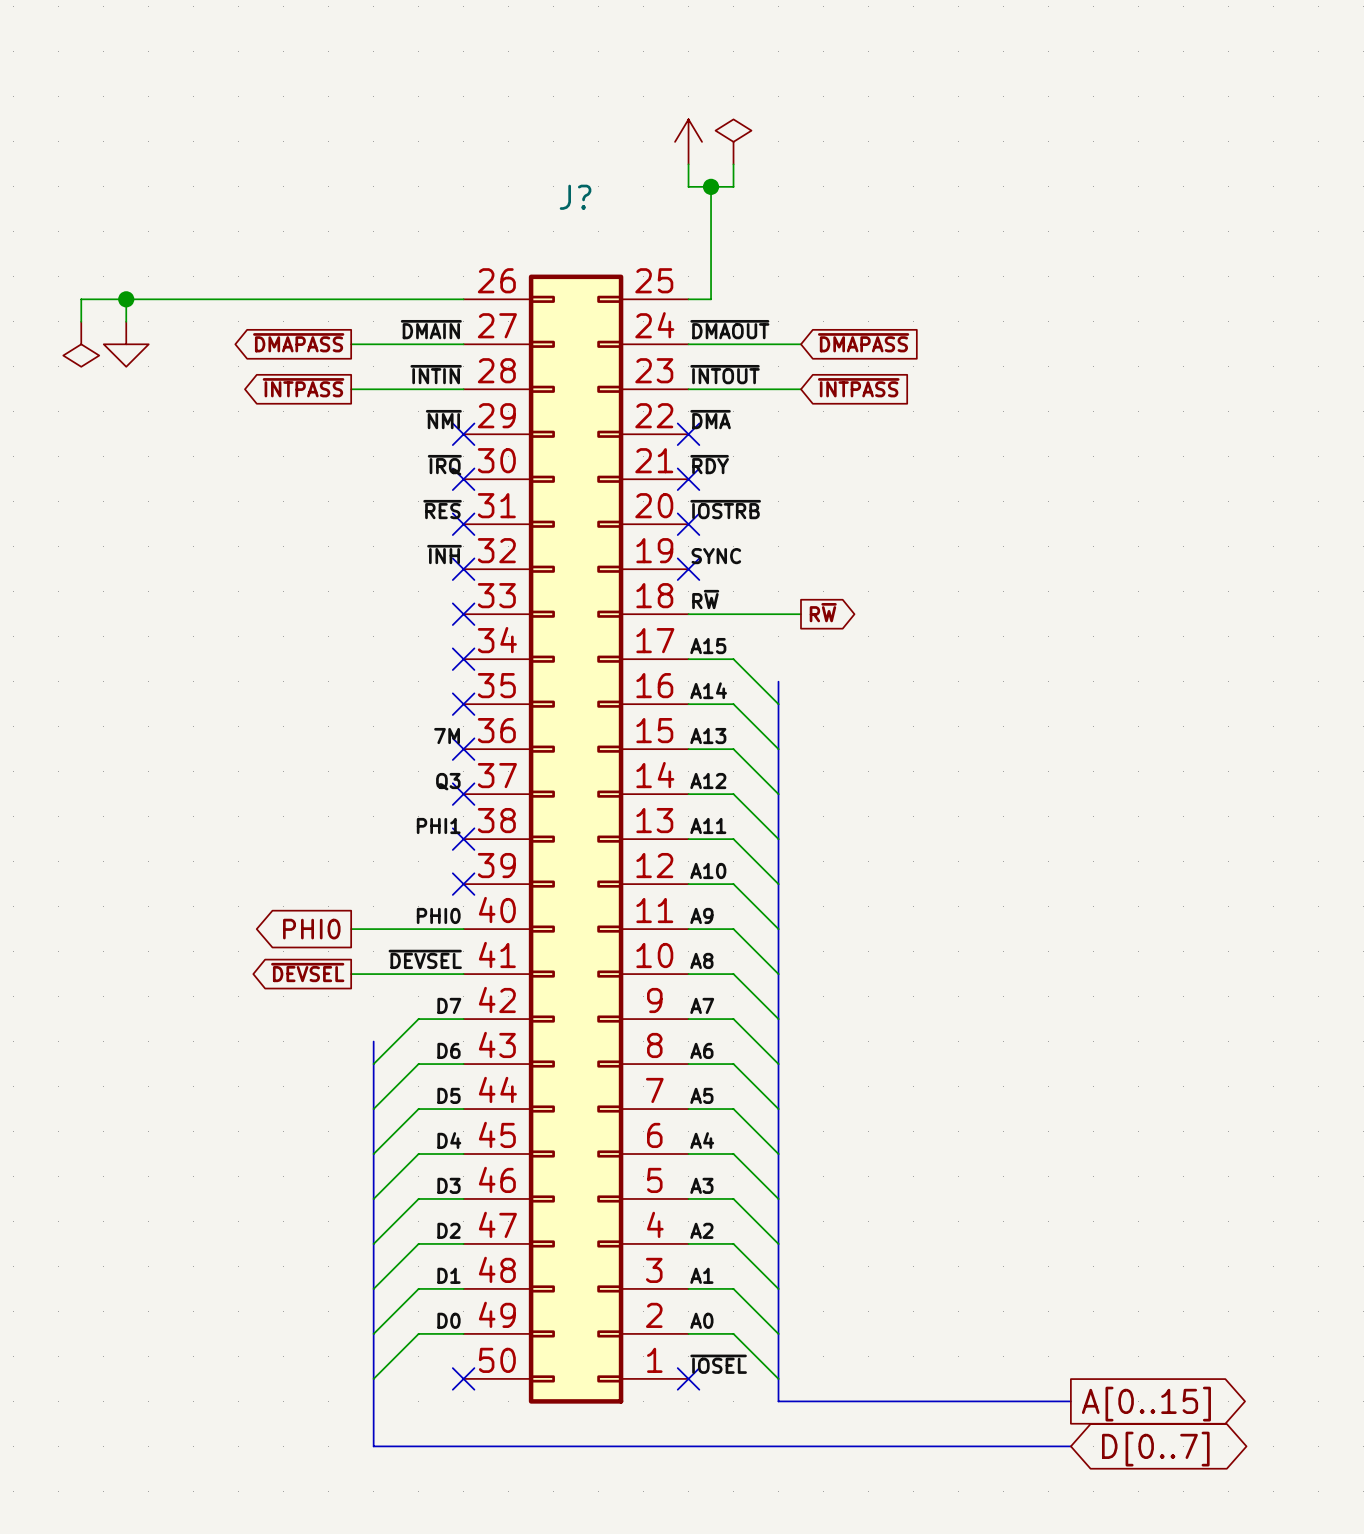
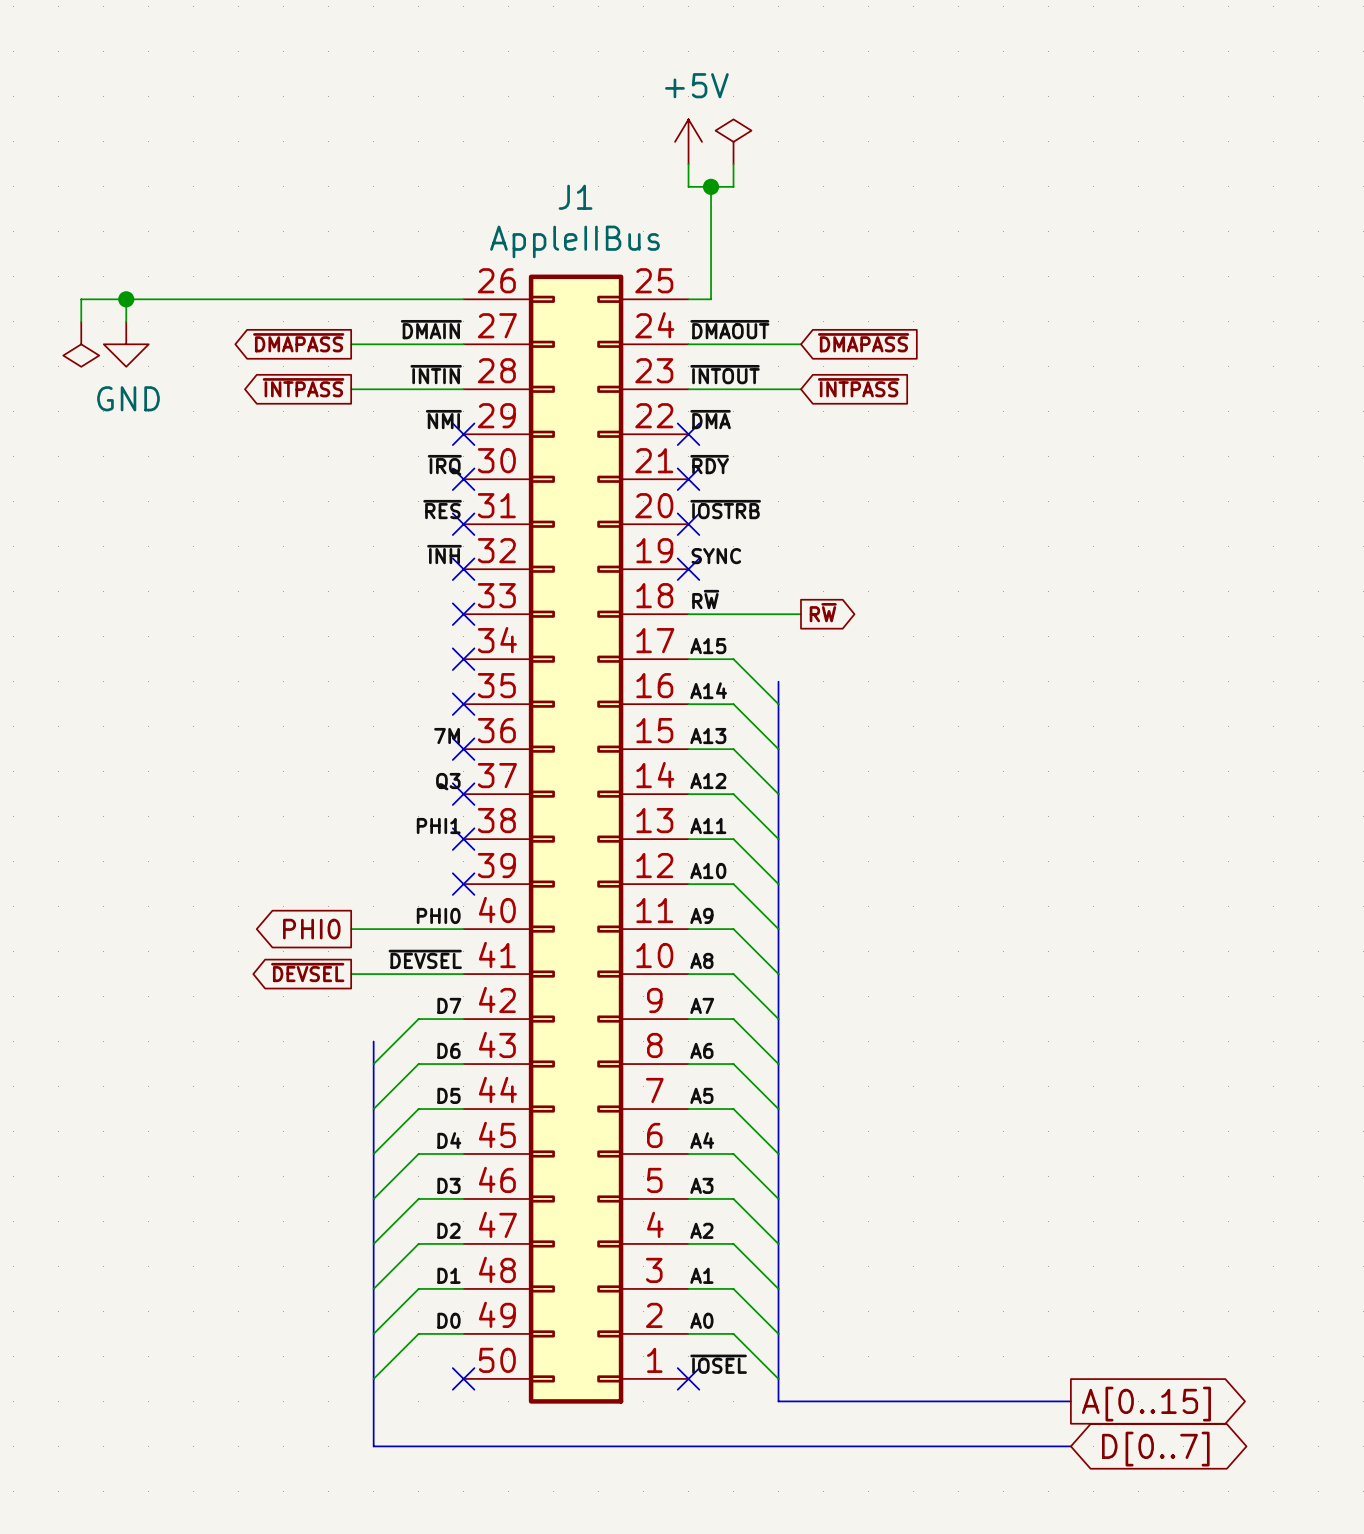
power symbol text: none -> +5V (696, 85)
J? name: J? (575, 197) -> J1 (575, 197)
J? value: none -> AppleIIBus (575, 241)
power symbol text: none -> GND (128, 398)

